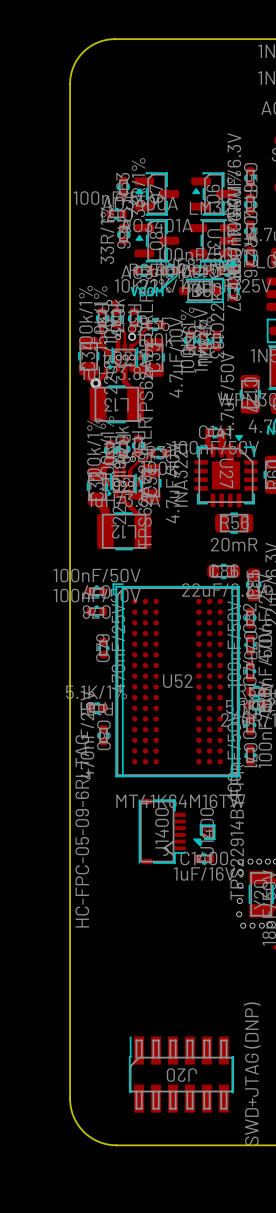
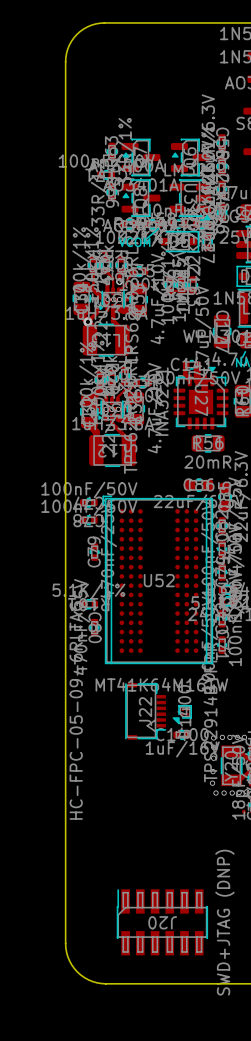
J1400 name: J1400 (162, 831) -> J22 (145, 711)

